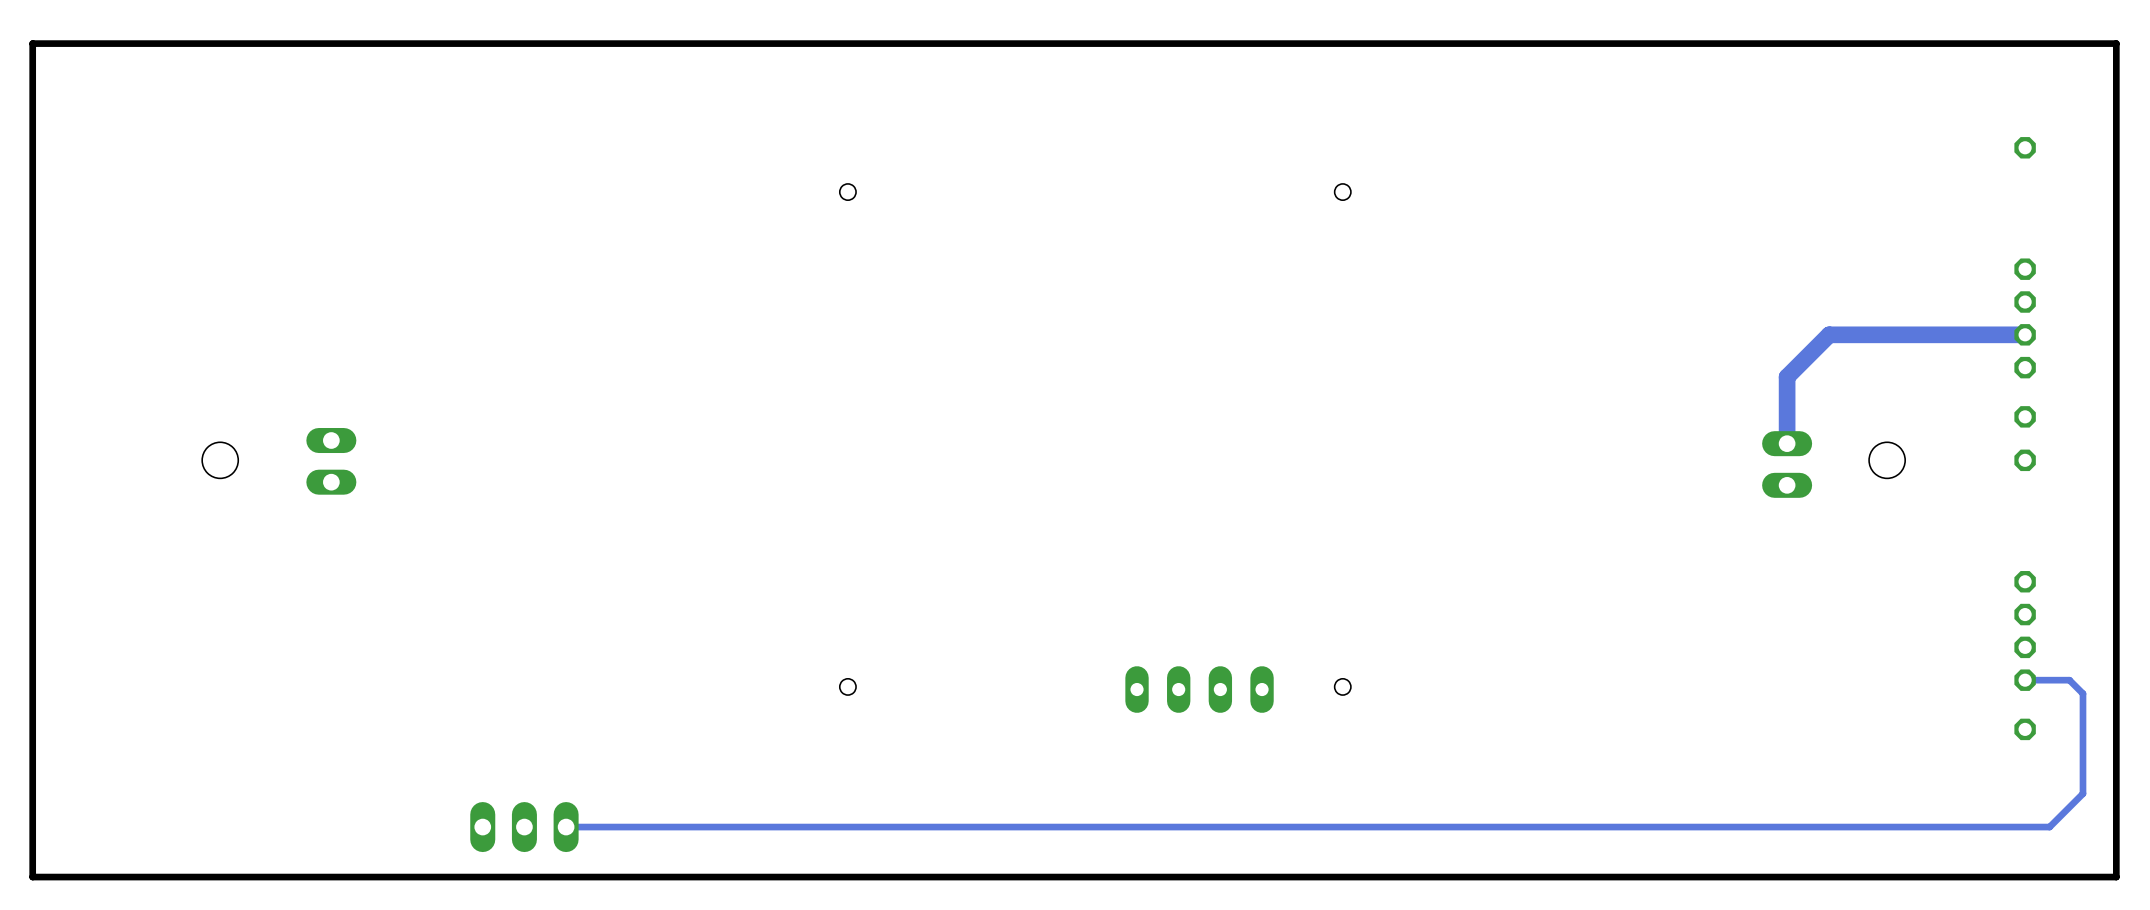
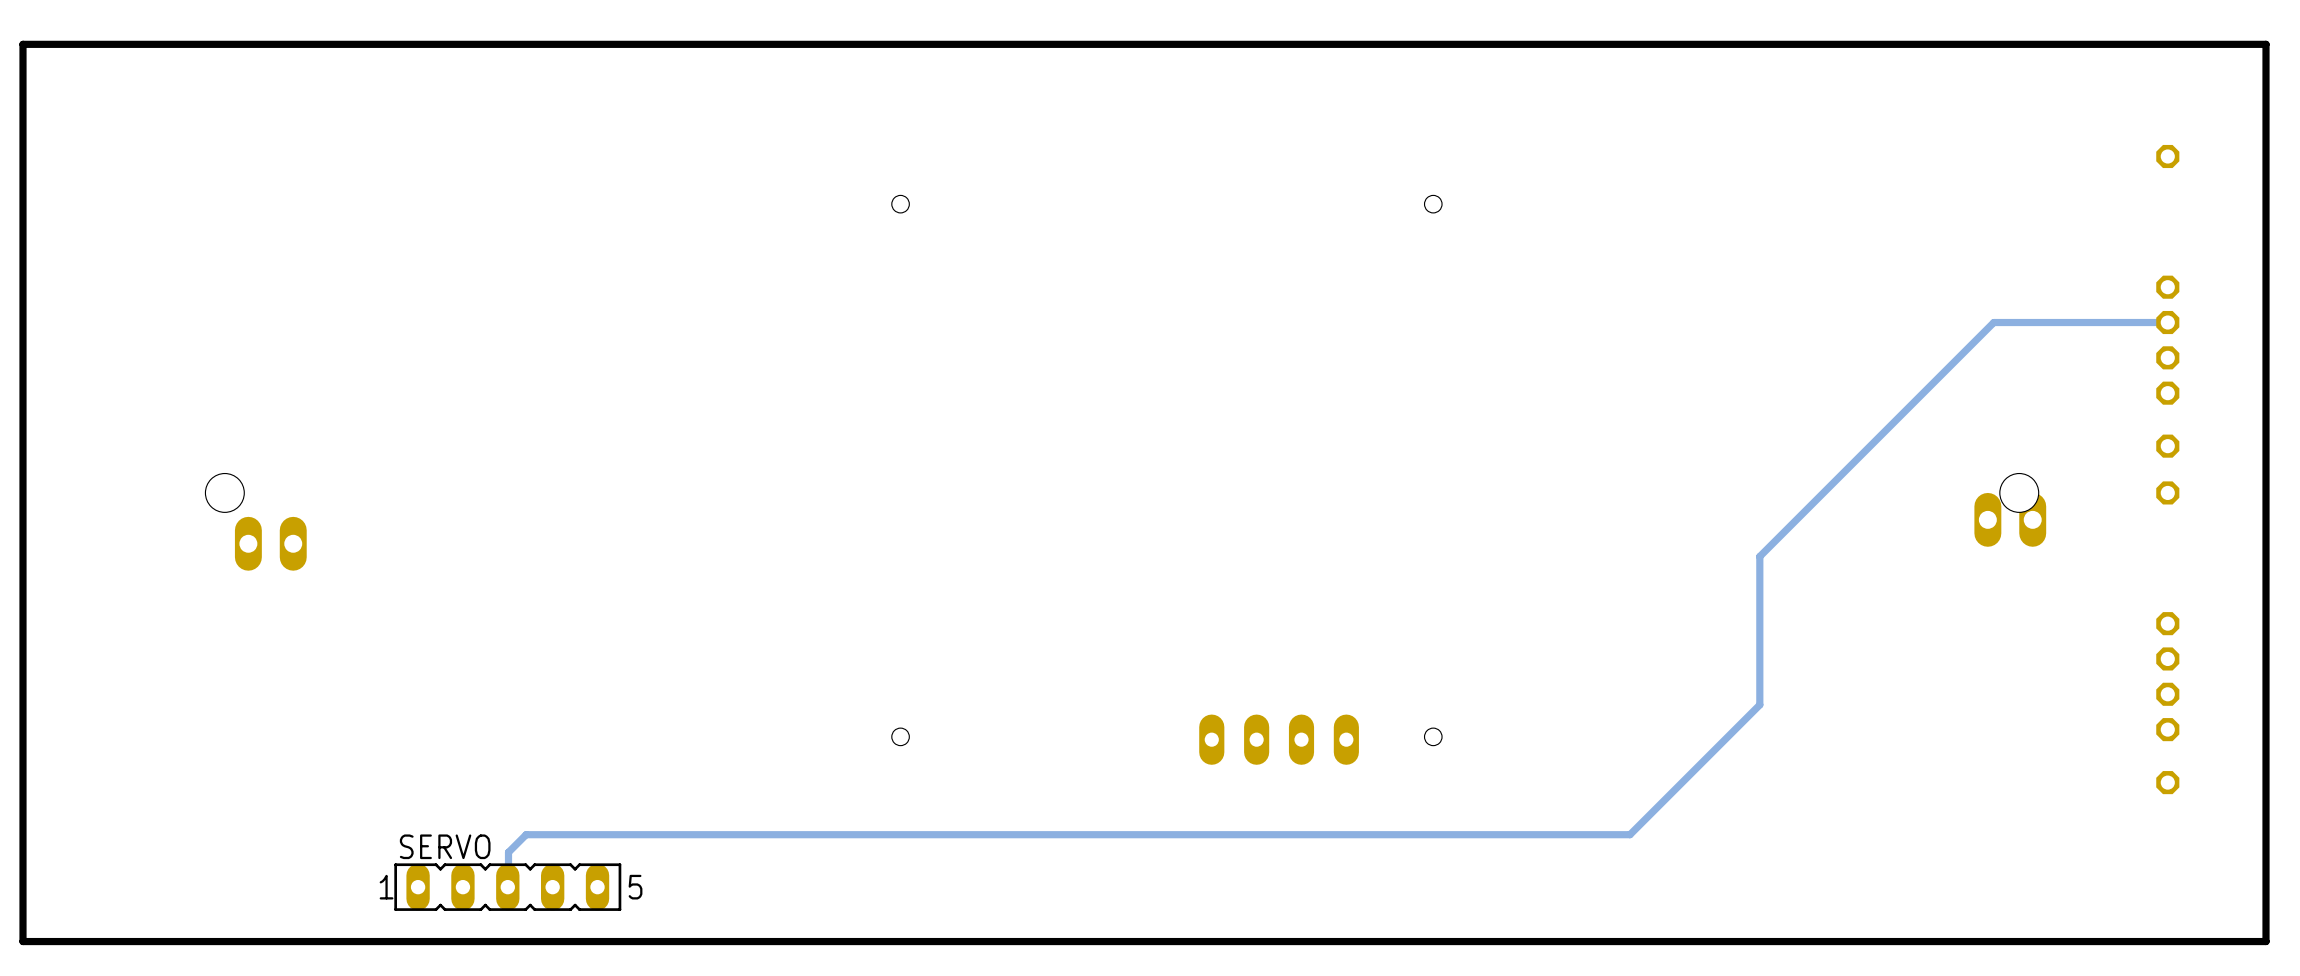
track: none -> (2167, 322) (1993, 322) (1759, 556) (1759, 704) (1630, 834) (526, 834) (508, 852) (508, 885)
track: (2025, 334) (1829, 334) (1787, 376) (1787, 443) -> none
part rotation: 0° (331, 461) -> 90° clockwise (270, 543)
part position: (331, 461) -> (270, 543)
part rotation: 0° (1787, 464) -> 90° clockwise (2010, 519)
part position: (1787, 464) -> (2010, 519)
track: (2025, 680) (2069, 680) (2082, 693) (2082, 793) (2049, 827) (566, 827) -> none
SERVO: none -> (507, 887)
part: (524, 827) -> none

